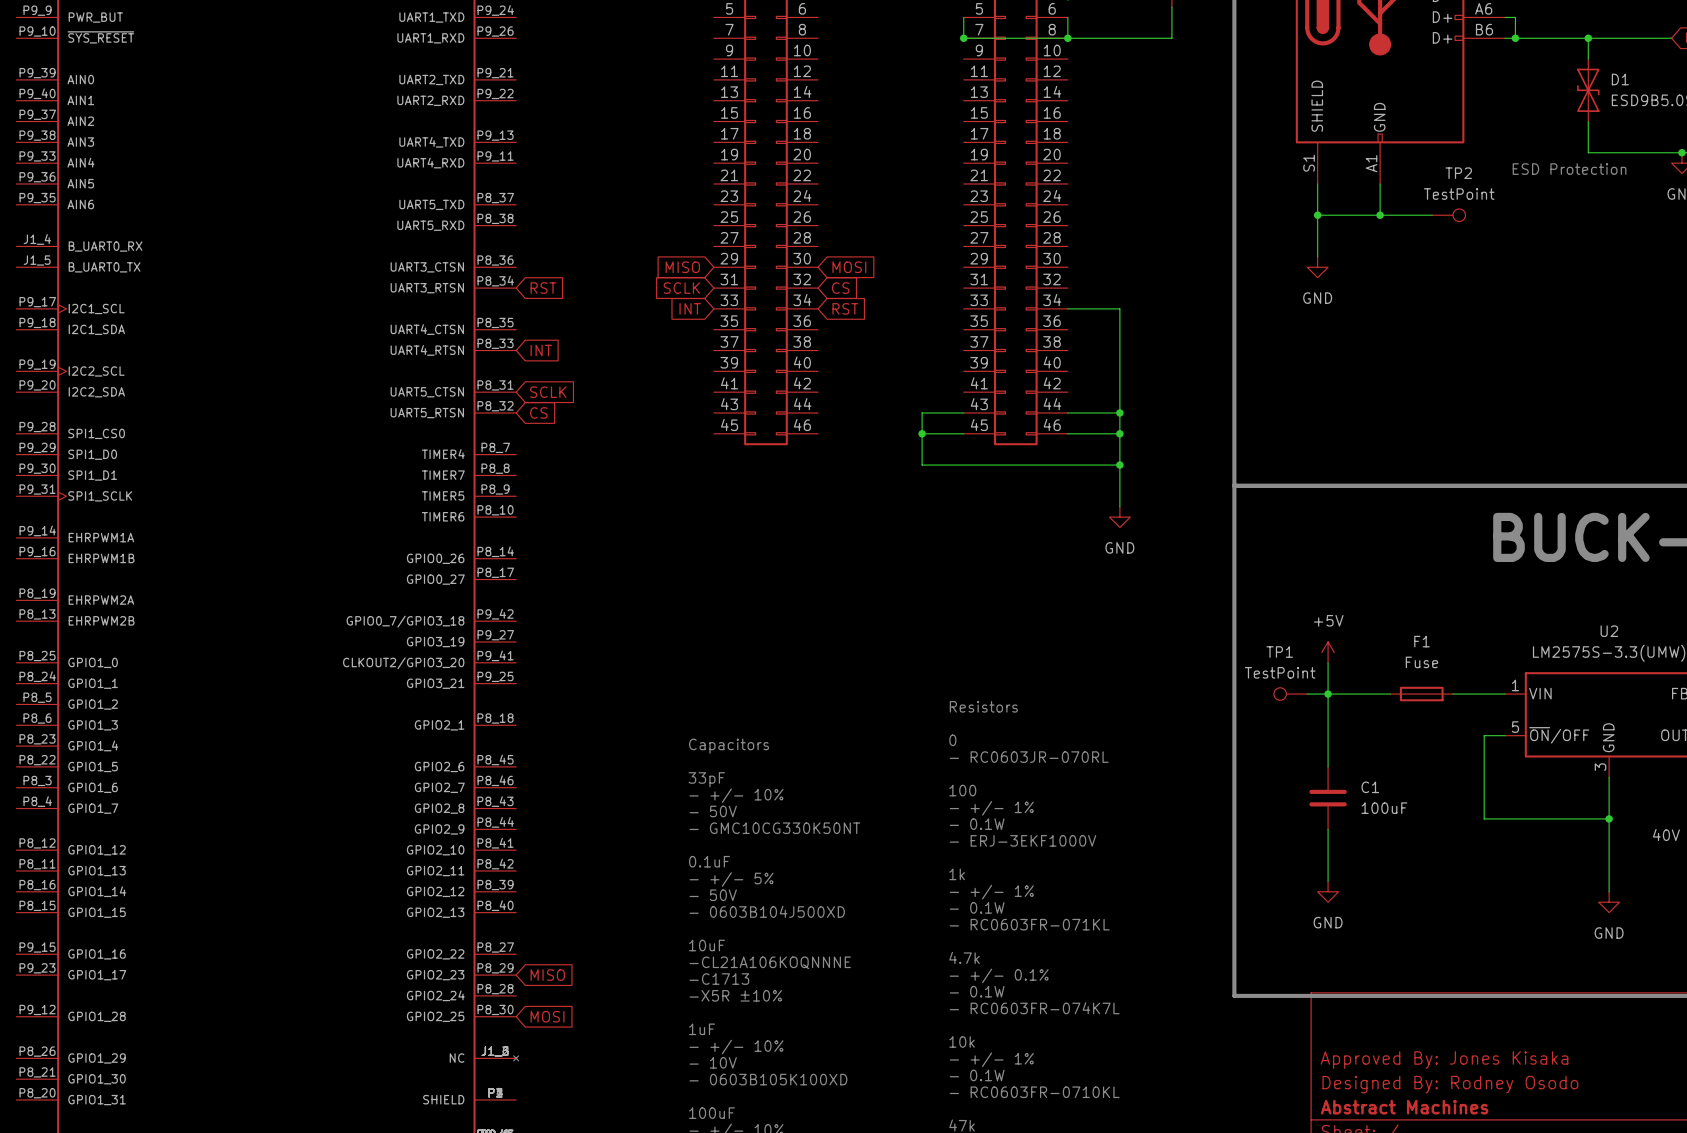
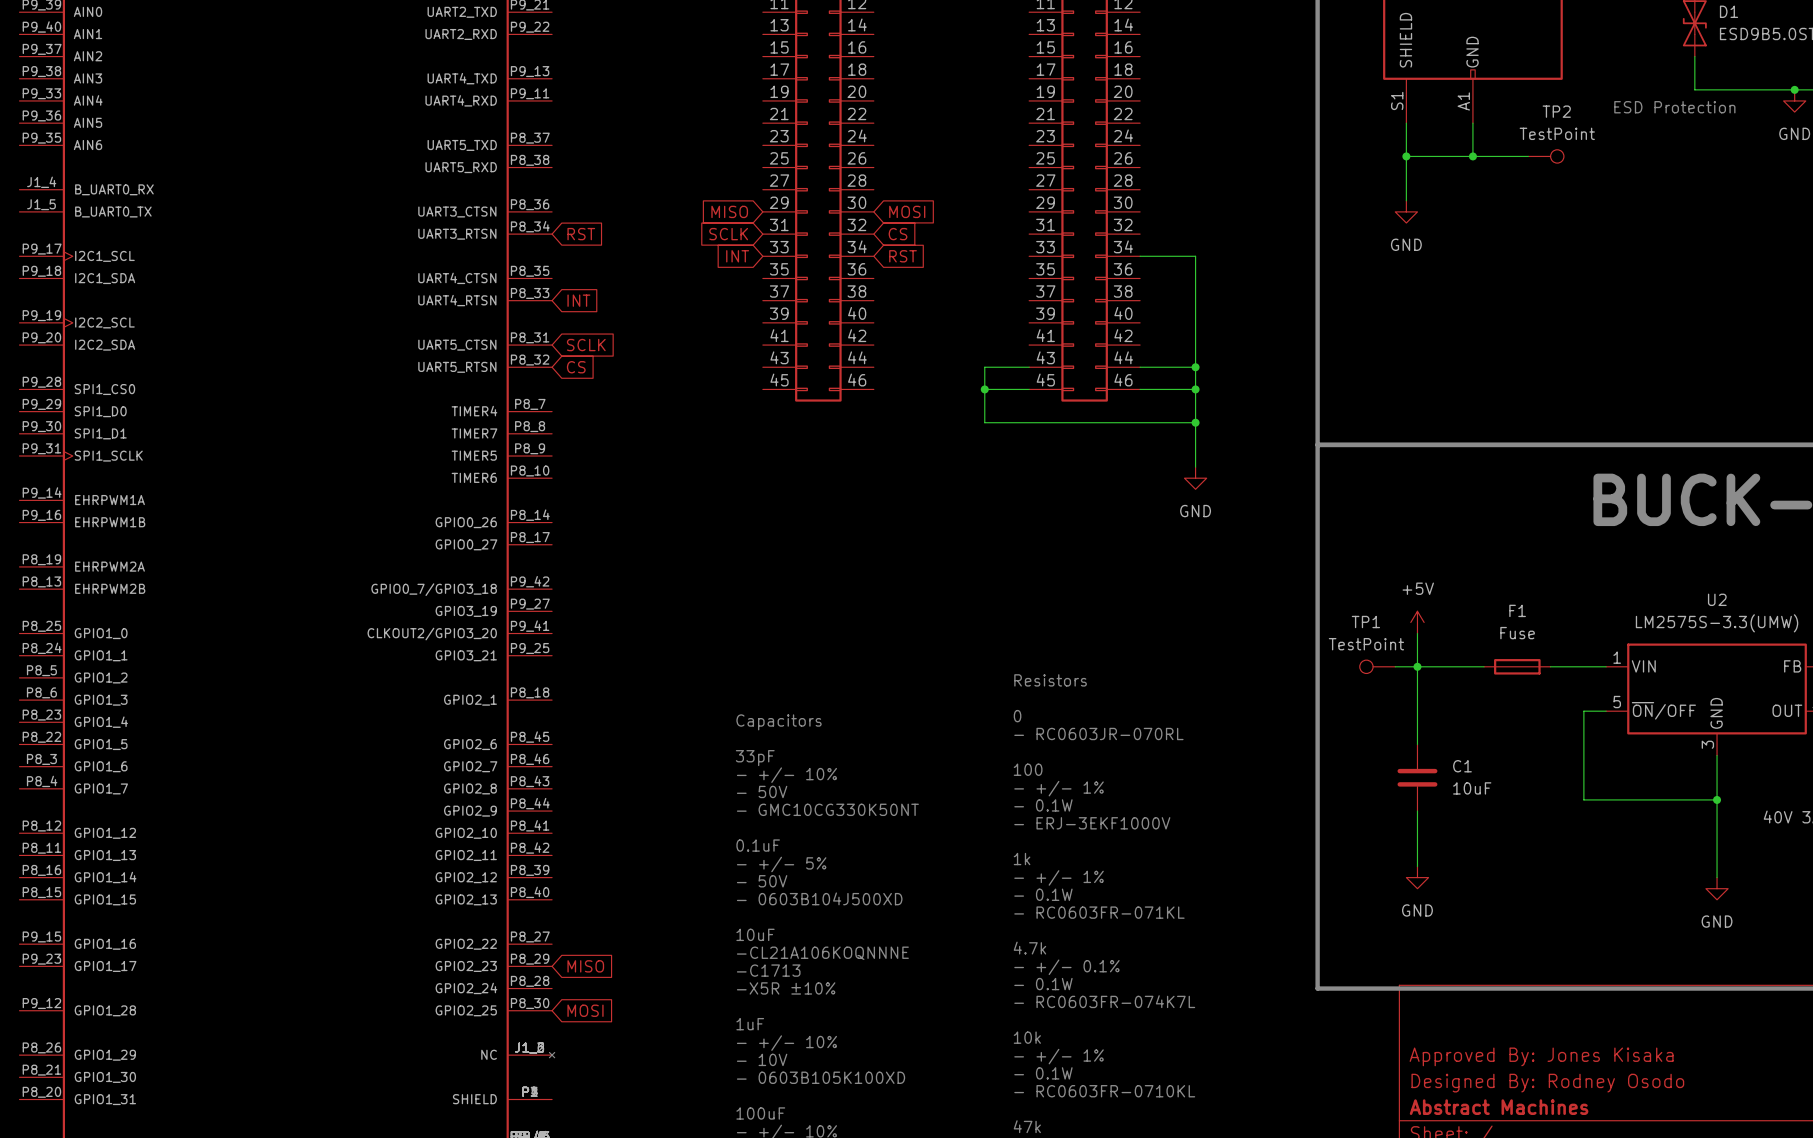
C1 value: 100uF (1384, 808) -> 10uF (1472, 788)

